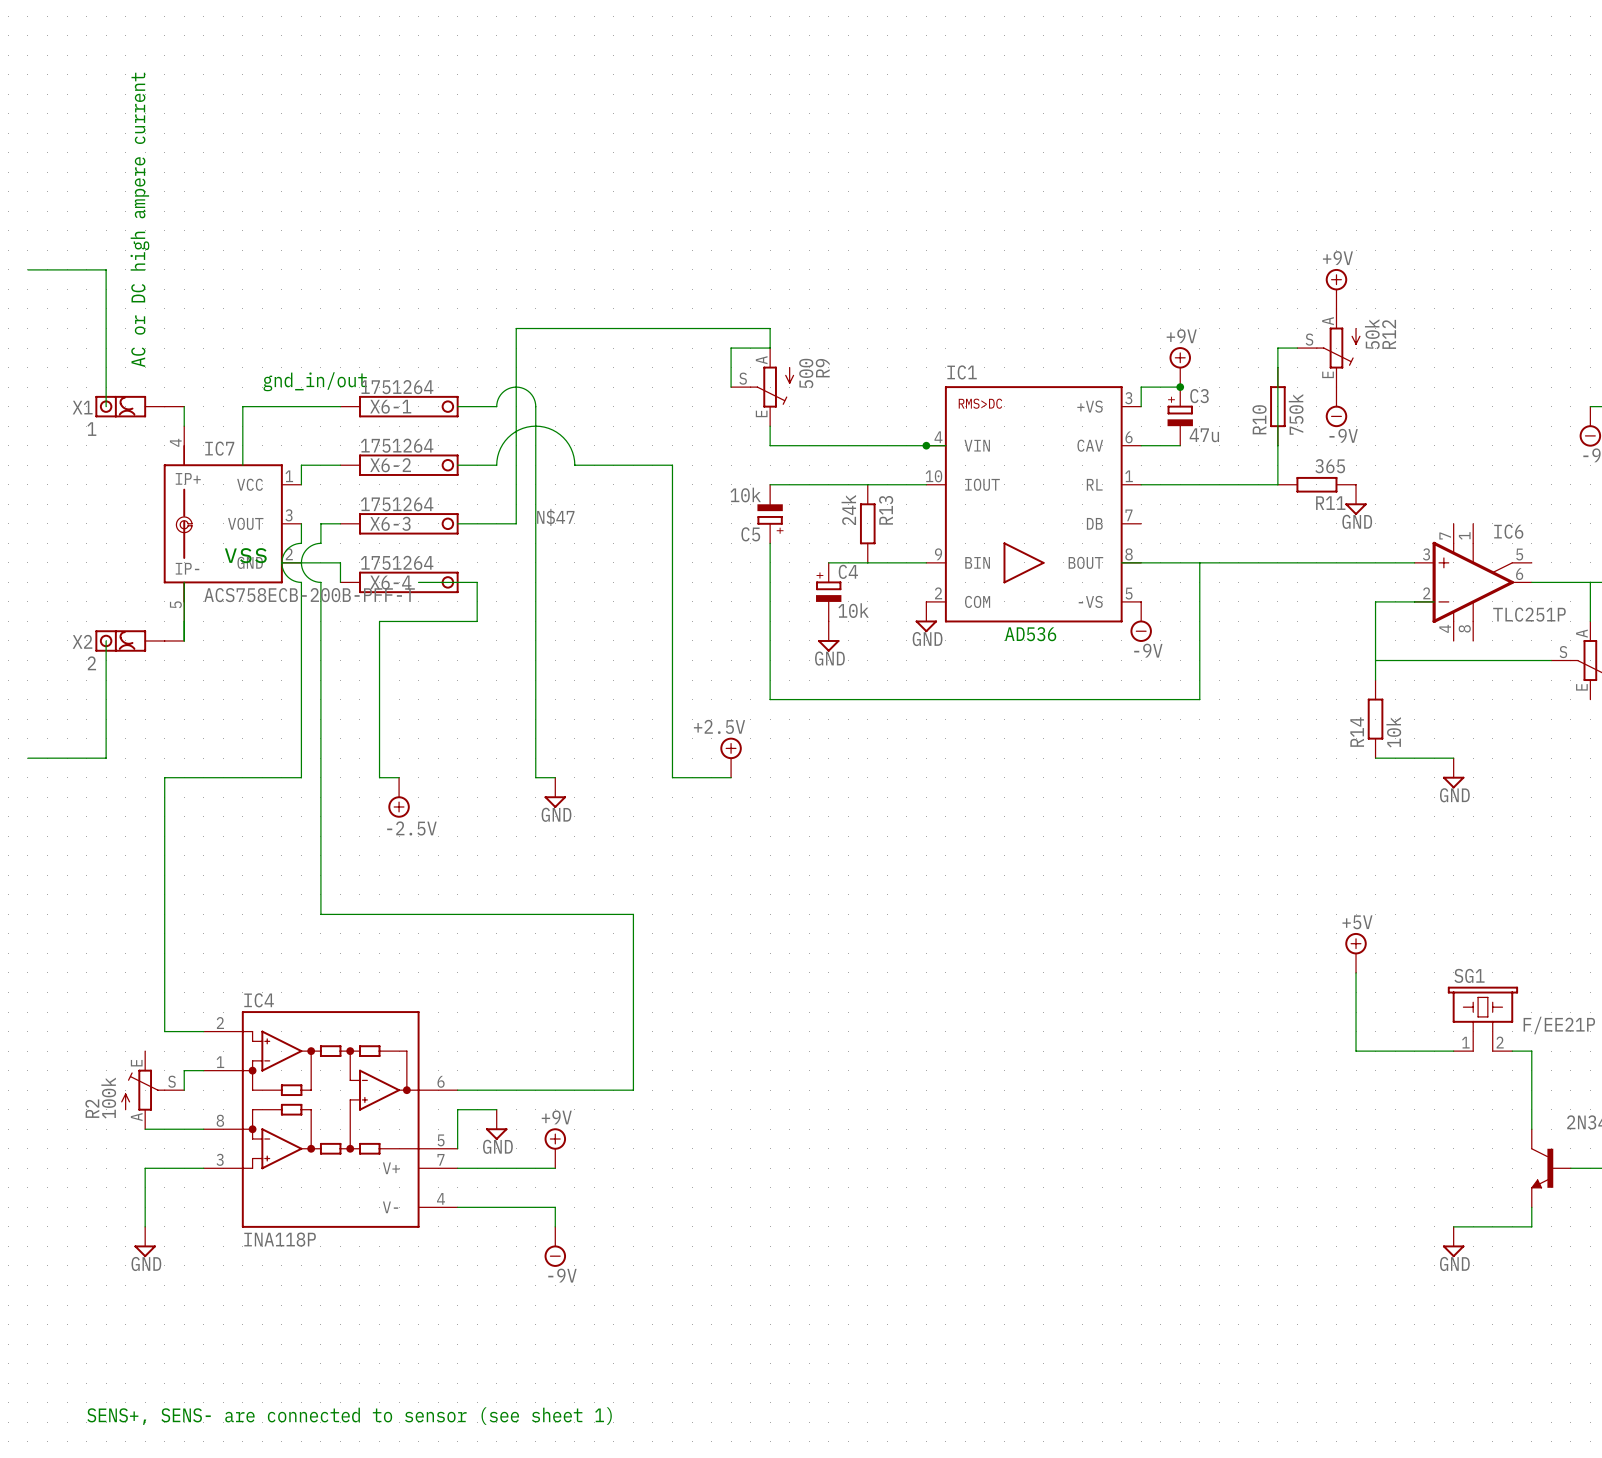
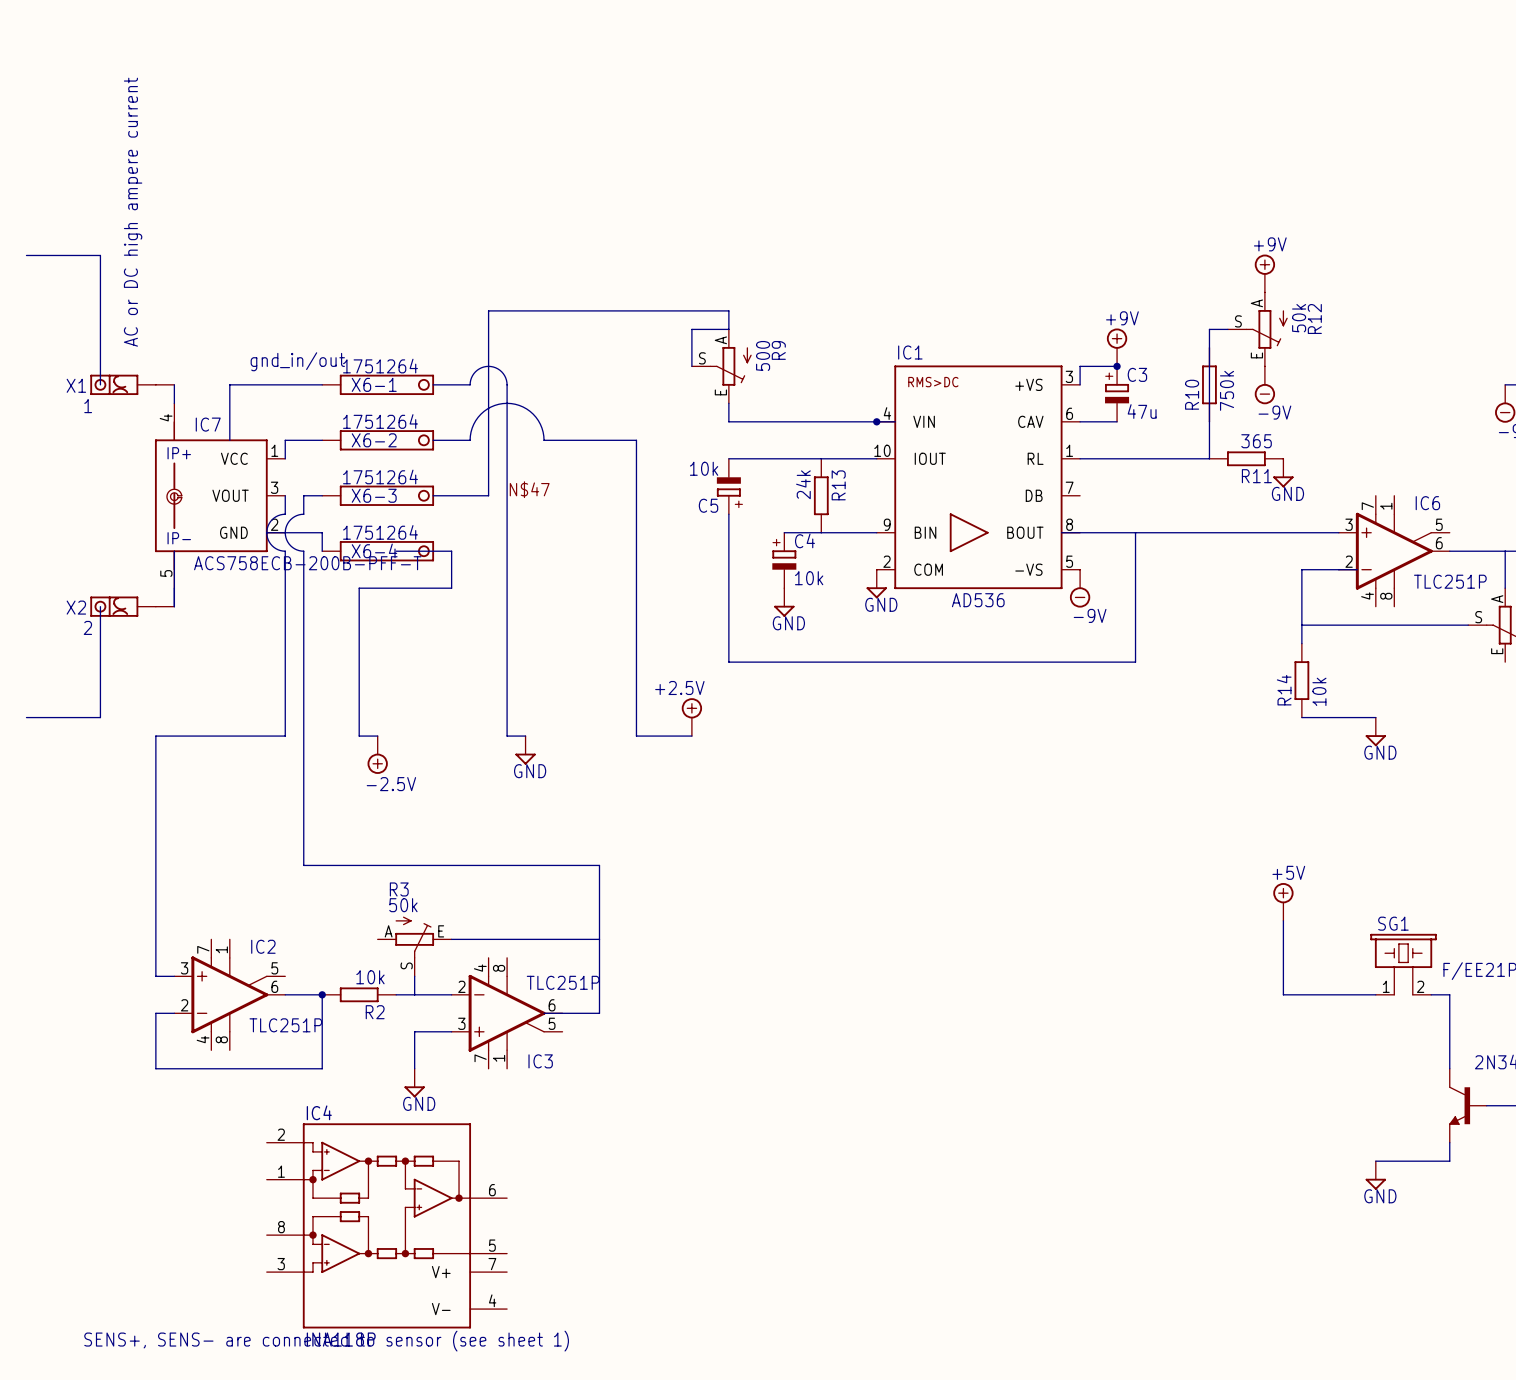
text: vss (245, 555) -> none
wire: none -> (451, 939) (599, 939)
R3: none -> 50k (414, 946)
wire: none -> (414, 976) (414, 994)
R2 symbol: [121, 1051, 185, 1130] -> [322, 987, 397, 1003]
IC2: none -> TLC251P (229, 994)
wire: none -> (285, 994) (322, 994) (322, 1068) (192, 1068)
junction: none -> (322, 994)
wire: none -> (396, 994) (451, 994)
wire: (203, 1070) (184, 1070) (184, 1090) -> none
IC3: none -> TLC251P (507, 1013)
wire: (633, 1070) (633, 1090) (477, 1090) -> (599, 1013) (544, 1013)
wire: none -> (433, 1031) (414, 1031) (414, 1068)
R2 value: 100k (108, 1098) -> 10k (370, 977)
R2 name position: R2 (92, 1108) -> R2 (375, 1012)
wire: (496, 1109) (457, 1109) (457, 1148) -> none
IC4 position: (330, 1119) -> (386, 1225)
power symbol position: GND (496, 1124) -> GND (414, 1083)
wire: (145, 1129) (164, 1129) -> (174, 1013) (155, 1013) (155, 1068)
power symbol: +9V (555, 1148) -> none
wire: (203, 1168) (145, 1168) (145, 1226) -> none
wire: (457, 1168) (555, 1168) -> none
wire: (457, 1207) (555, 1207) (555, 1226) -> none
power symbol: GND (145, 1242) -> none
power symbol: -9V (555, 1246) -> none

